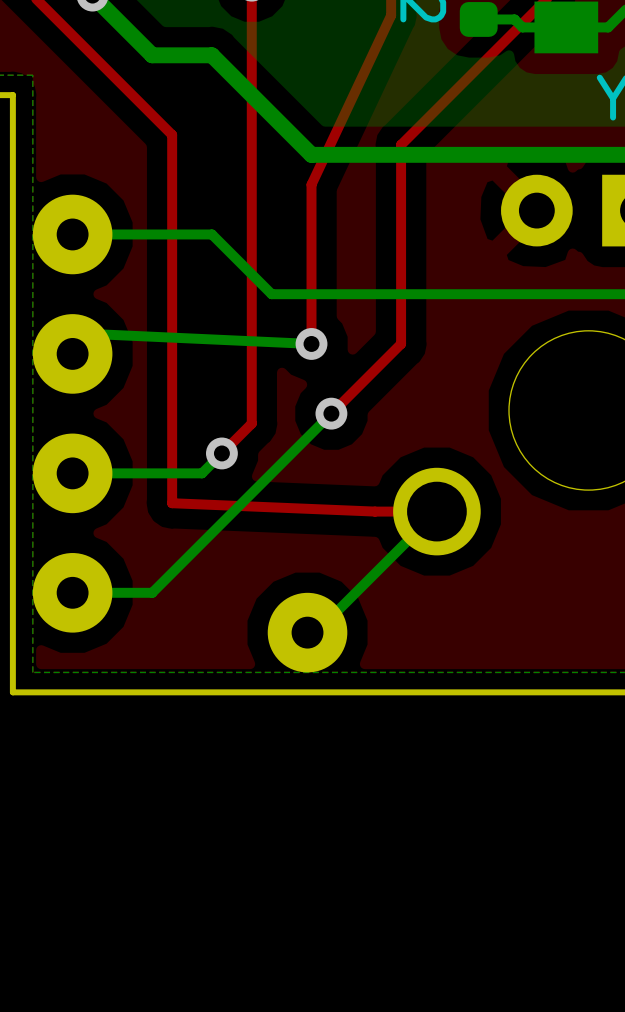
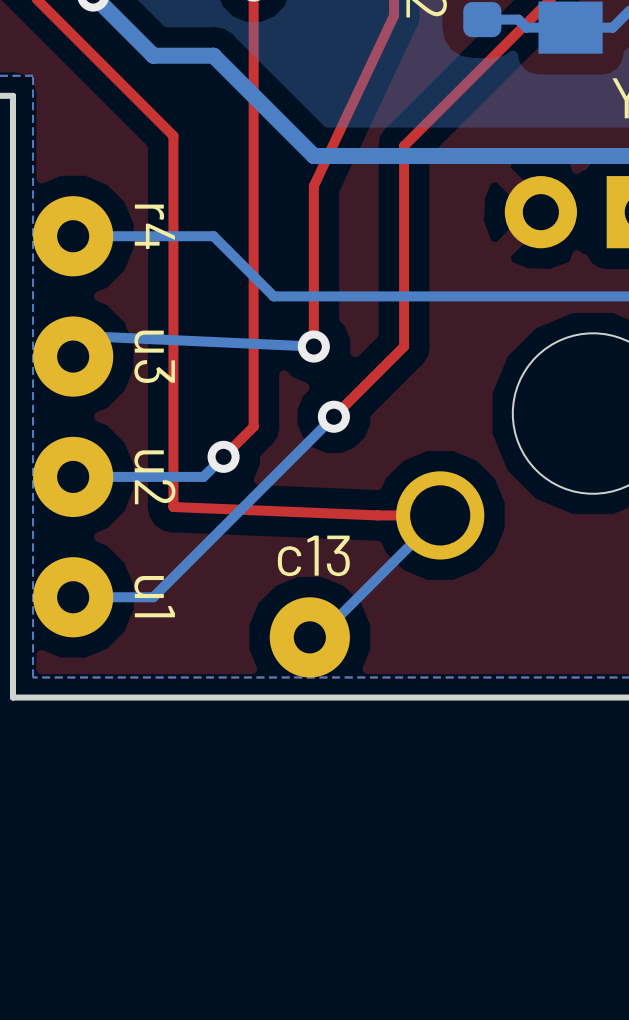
text: none -> r4 (154, 226)
text: none -> u3 (154, 356)
text: none -> u2 (154, 477)
text: none -> c13 (313, 555)
text: none -> u1 (154, 596)

